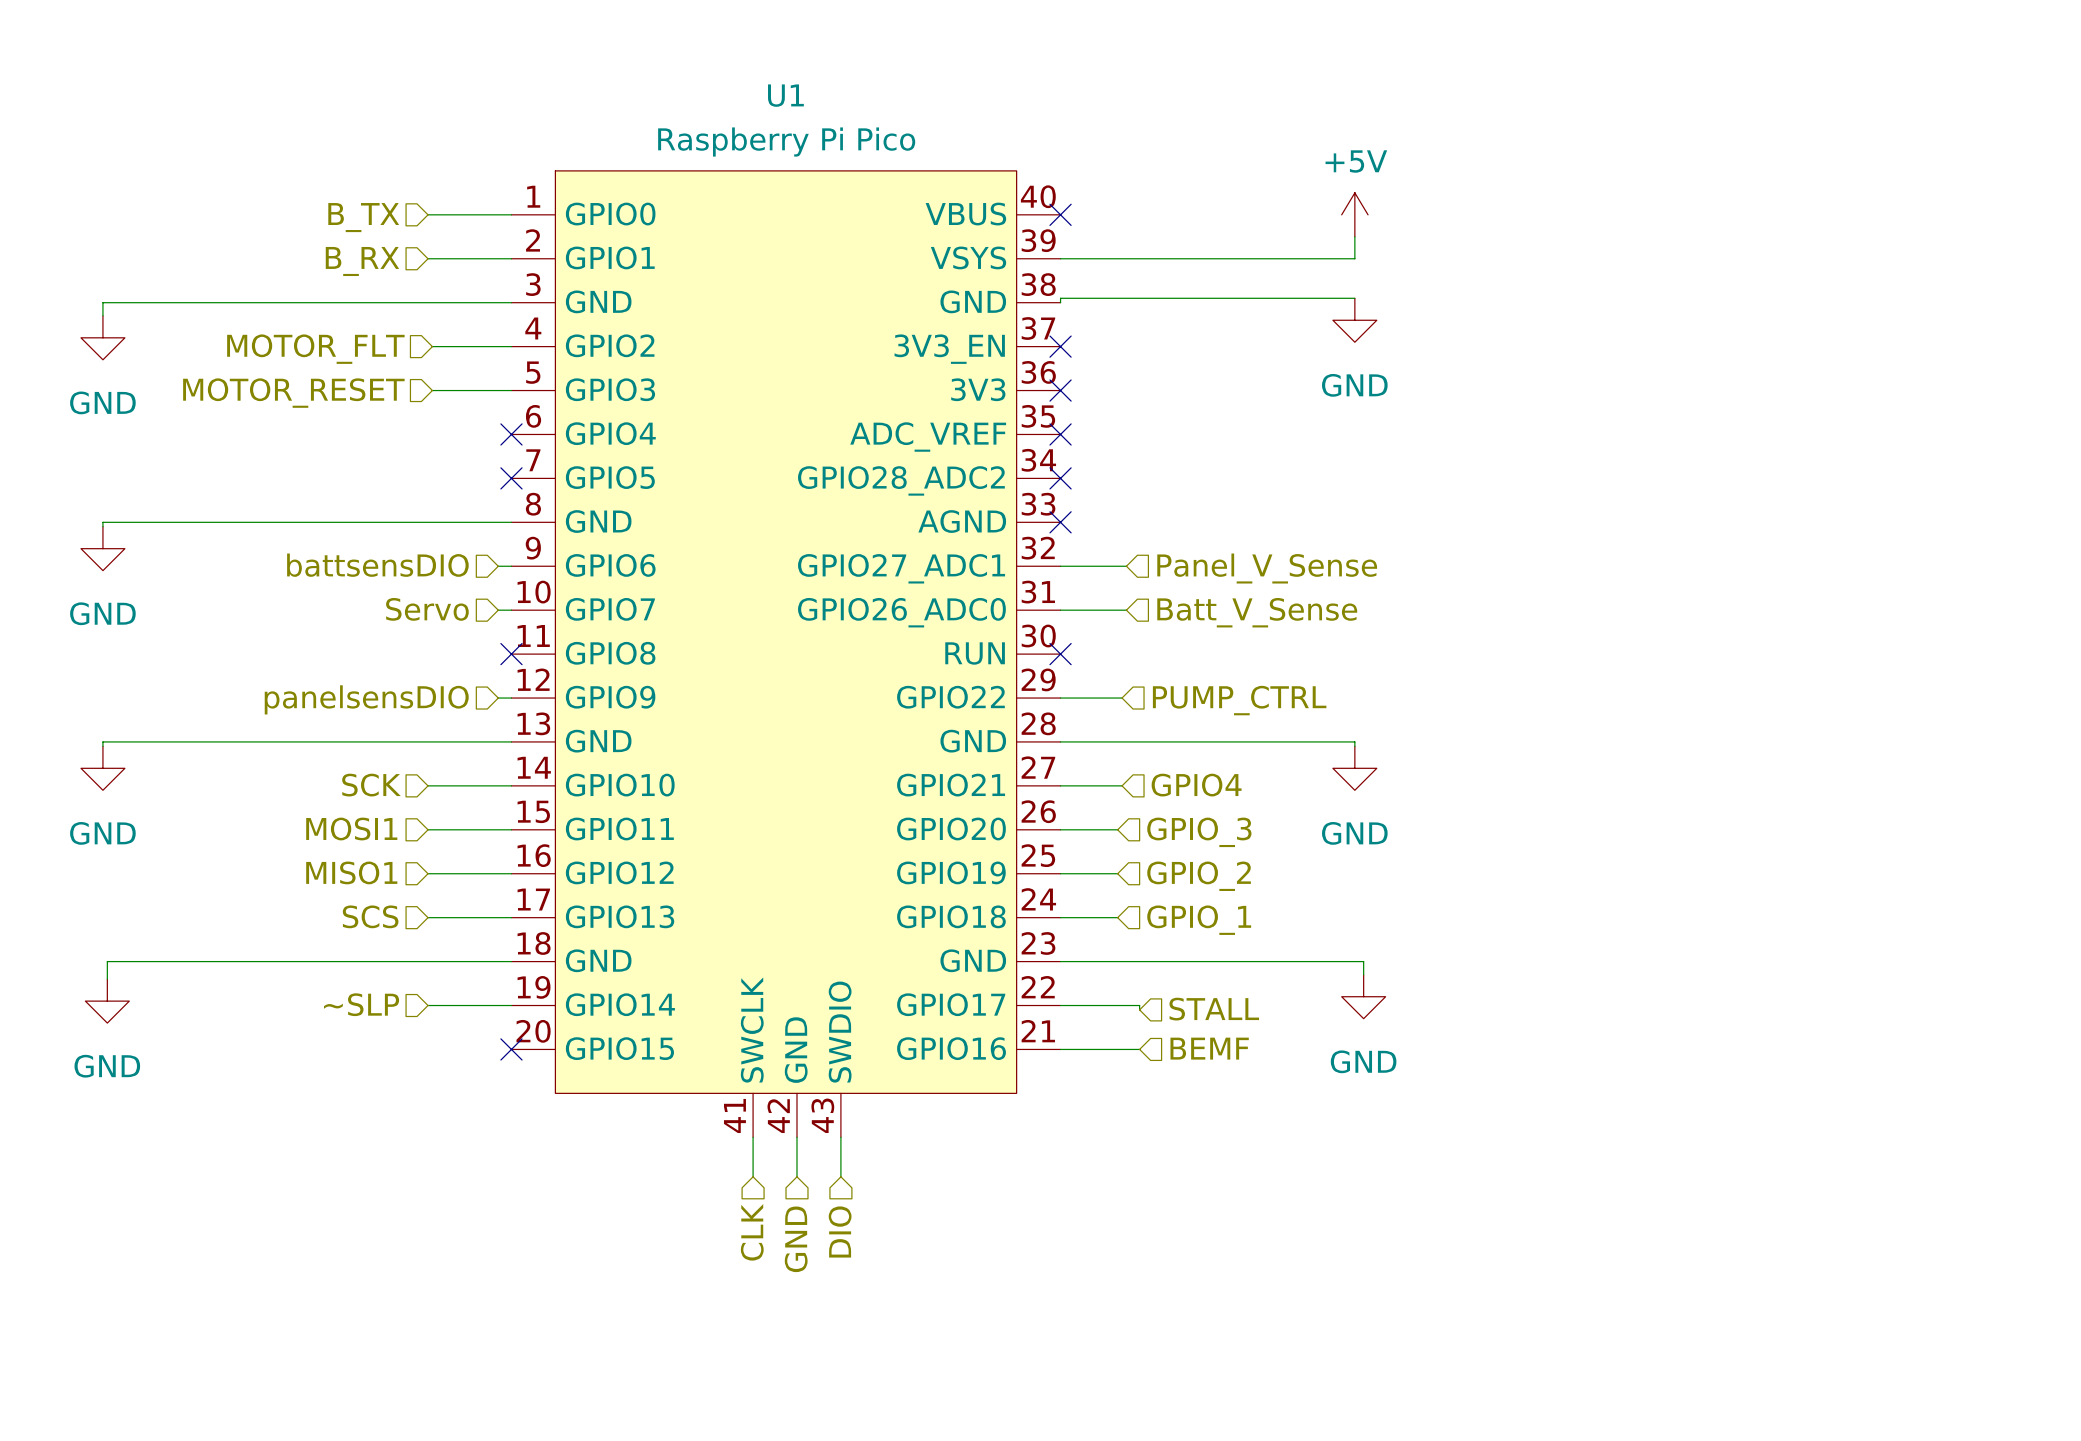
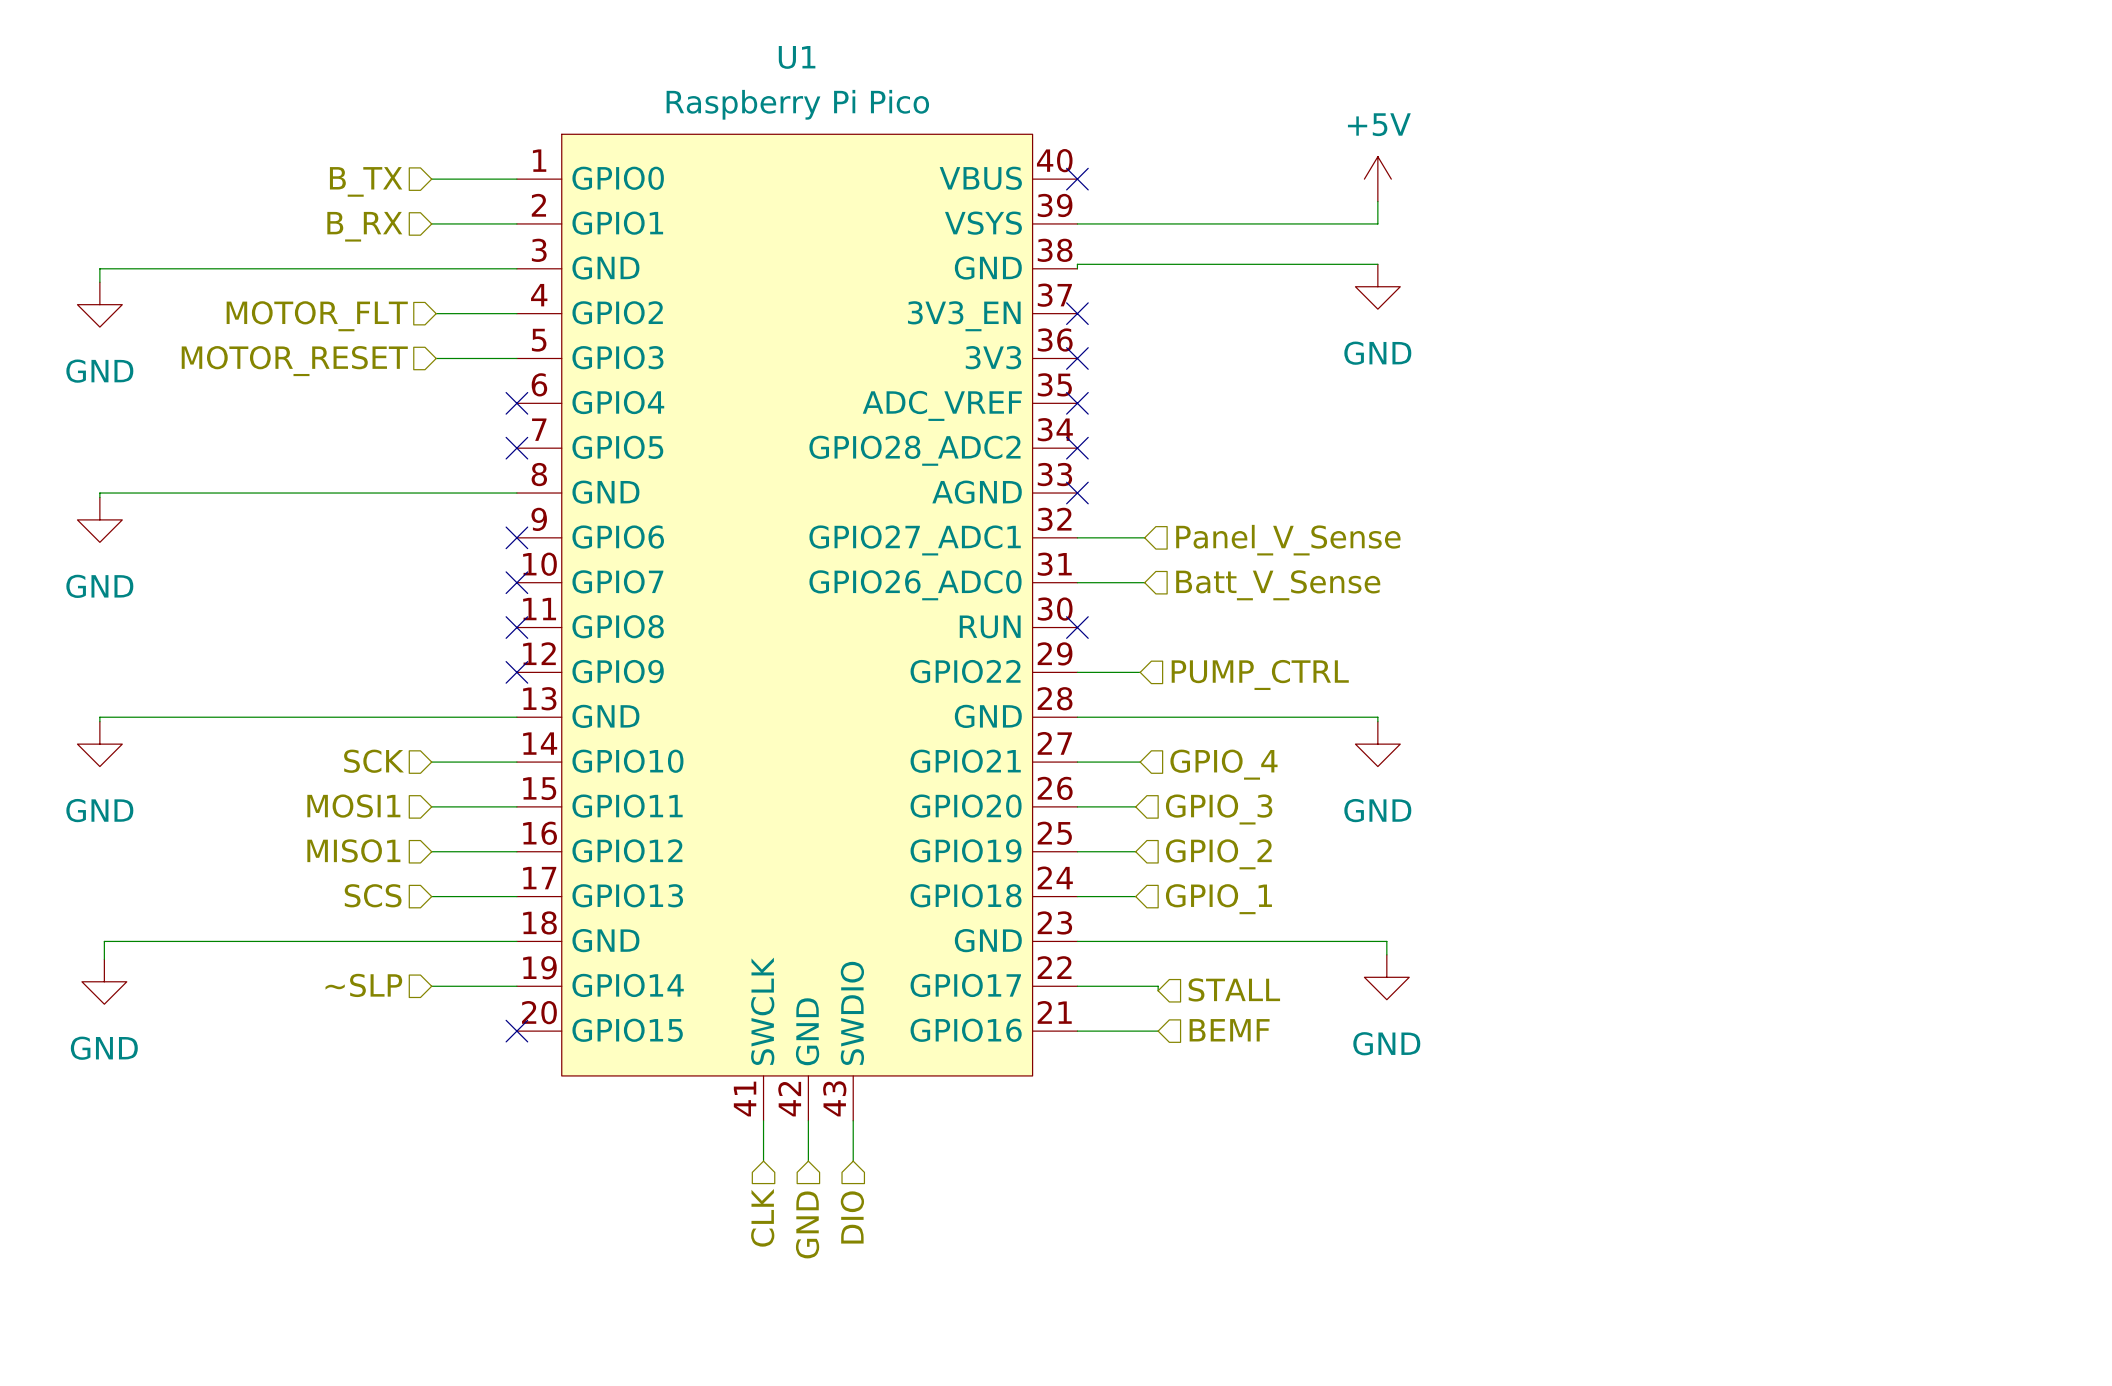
hierarchical label: battsensDIO (377, 565) -> none
wire: (498, 566) (511, 566) -> none
no-connect mark: none -> (516, 537)
hierarchical label: Servo (427, 609) -> none
wire: (498, 610) (511, 610) -> none
no-connect mark: none -> (516, 582)
wire: (498, 698) (511, 698) -> none
no-connect mark: none -> (516, 672)
hierarchical label: panelsensDIO (366, 699) -> none
hierarchical label: GPIO4 (1196, 785) -> GPIO_4 (1223, 764)

